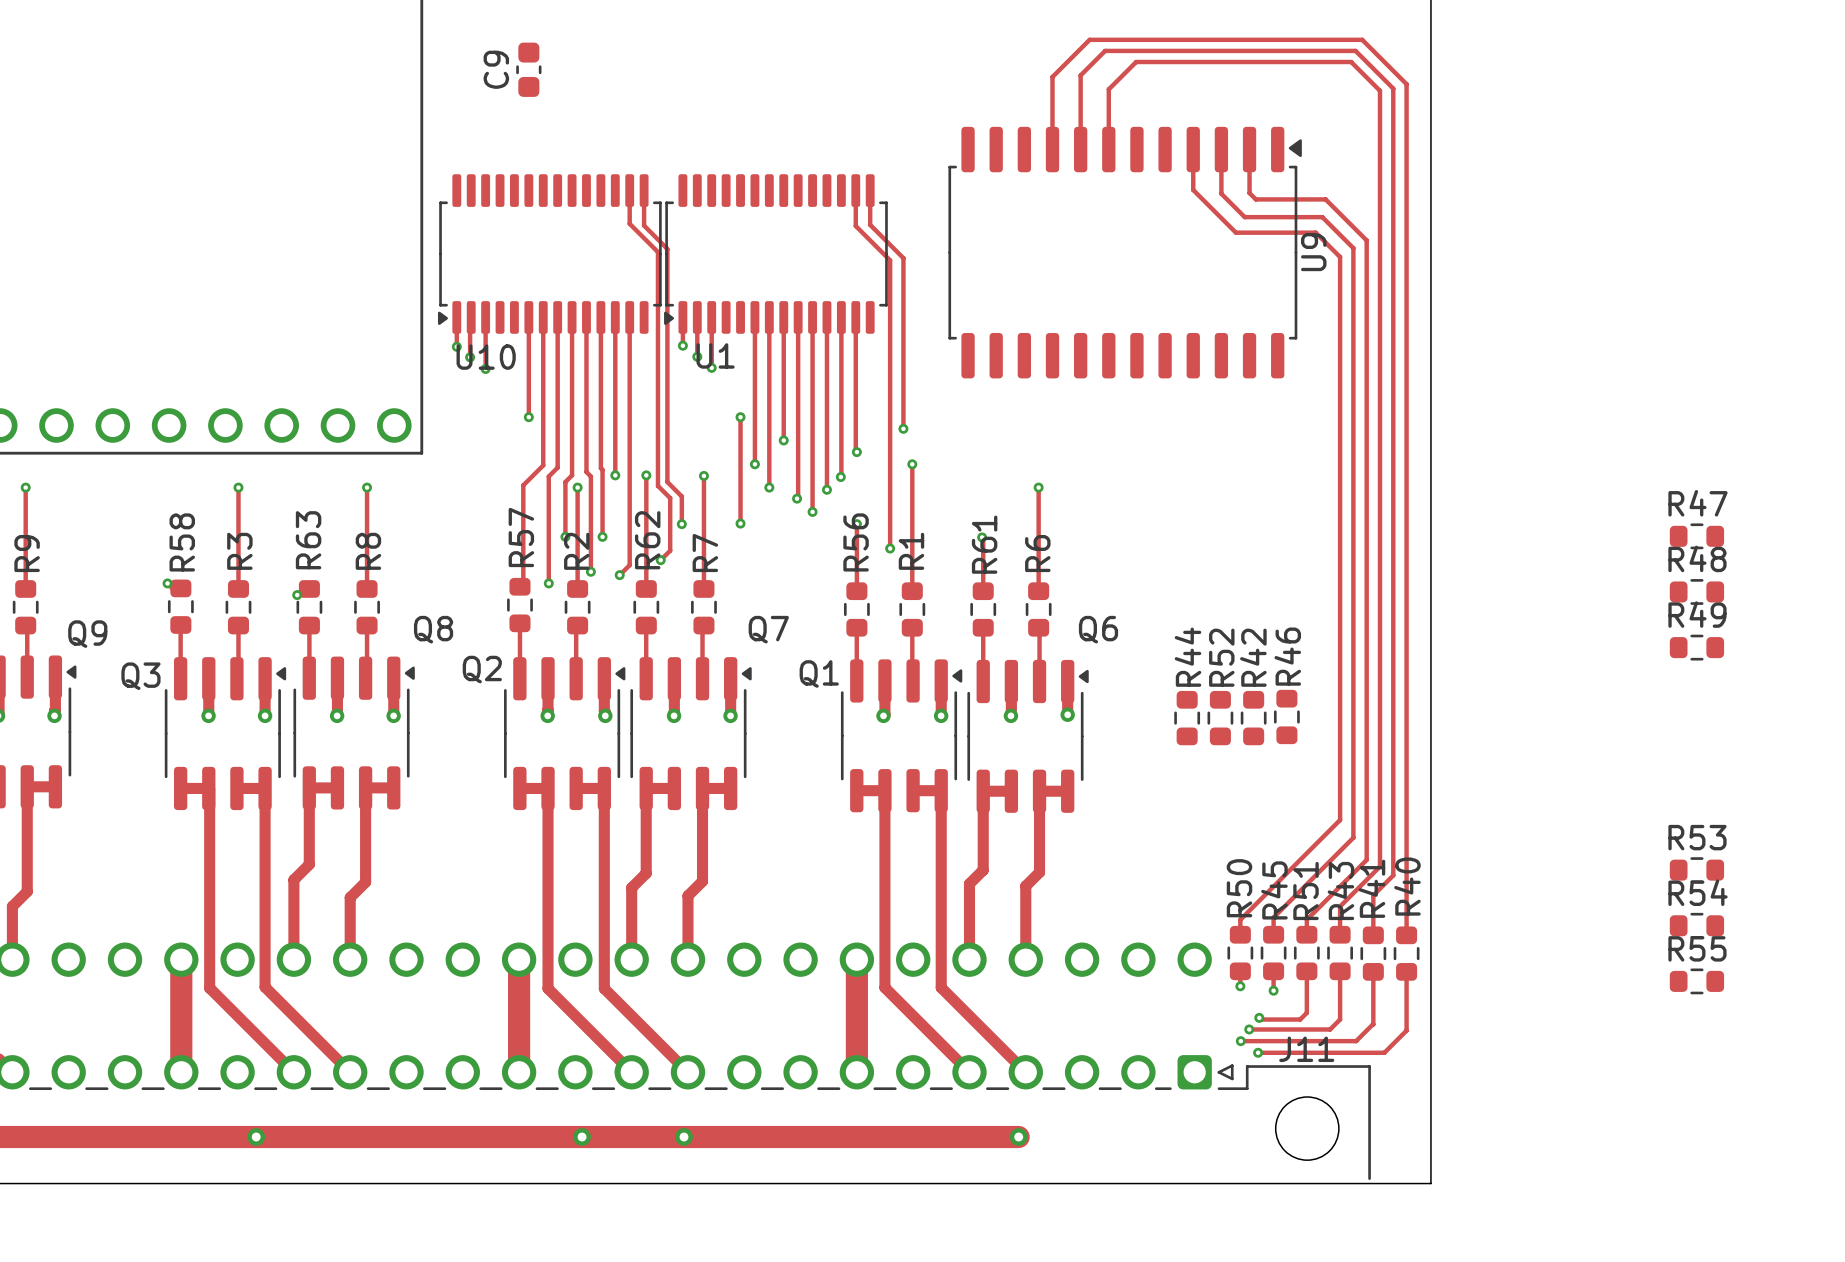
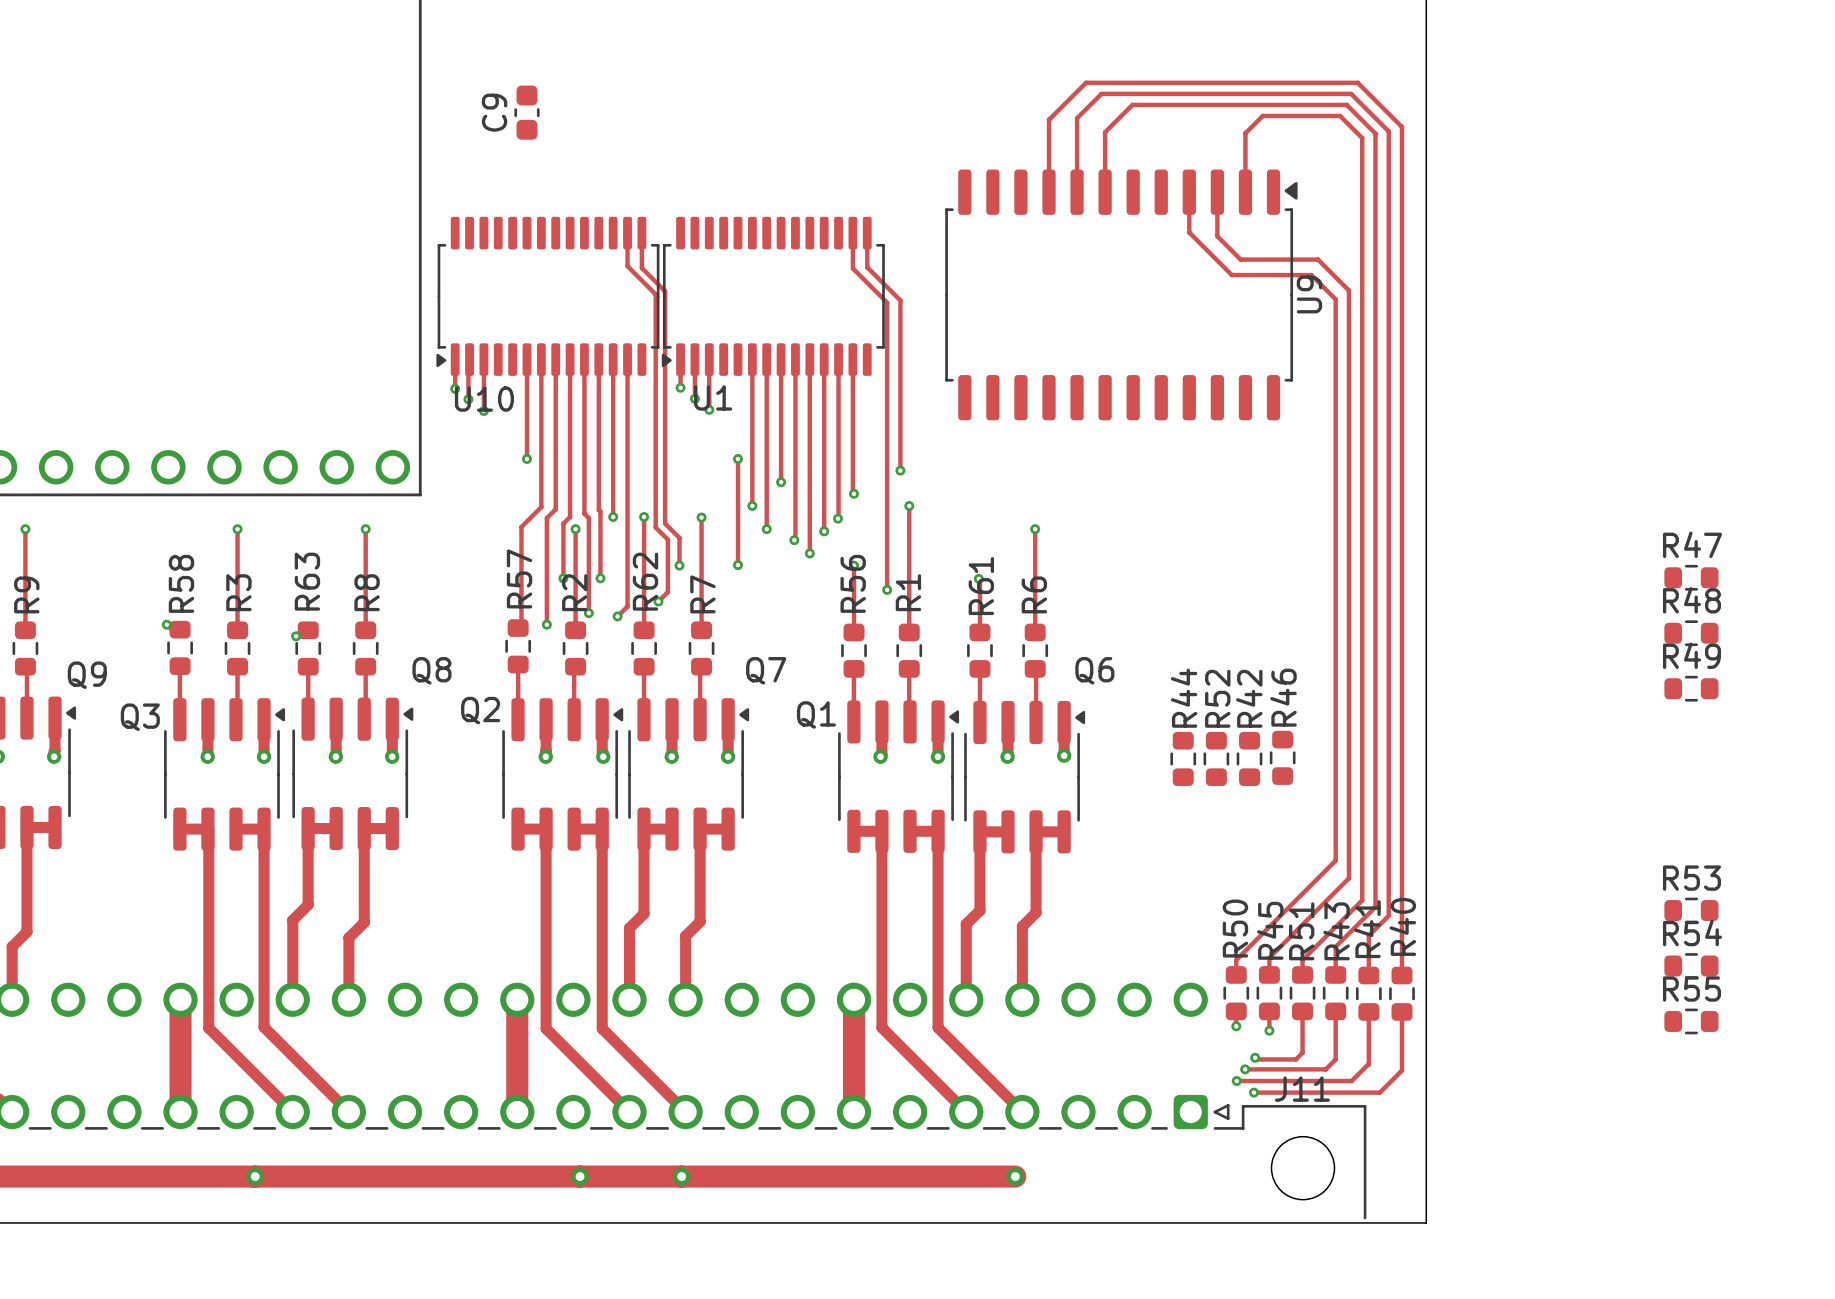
track: (1249, 149) (1249, 193) (1255, 199) (1325, 199) (1366, 240) -> (1245, 192) (1245, 133) (1262, 115) (1340, 115) (1362, 138) (1362, 282)

